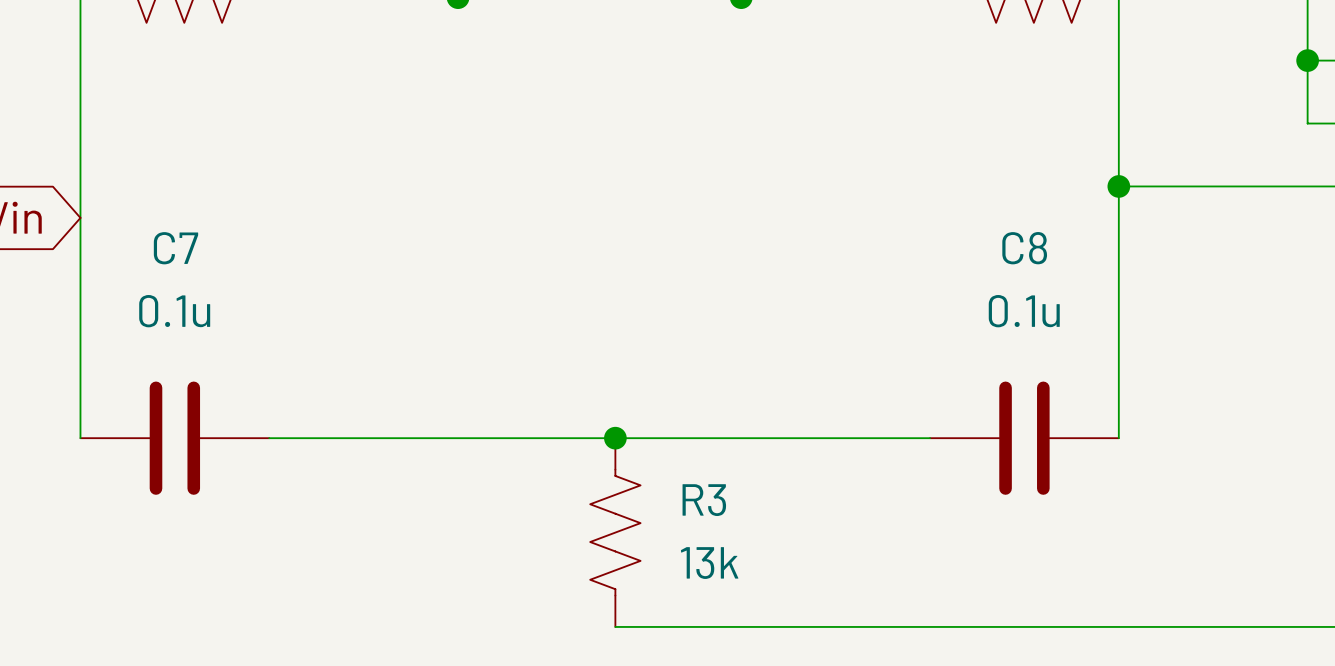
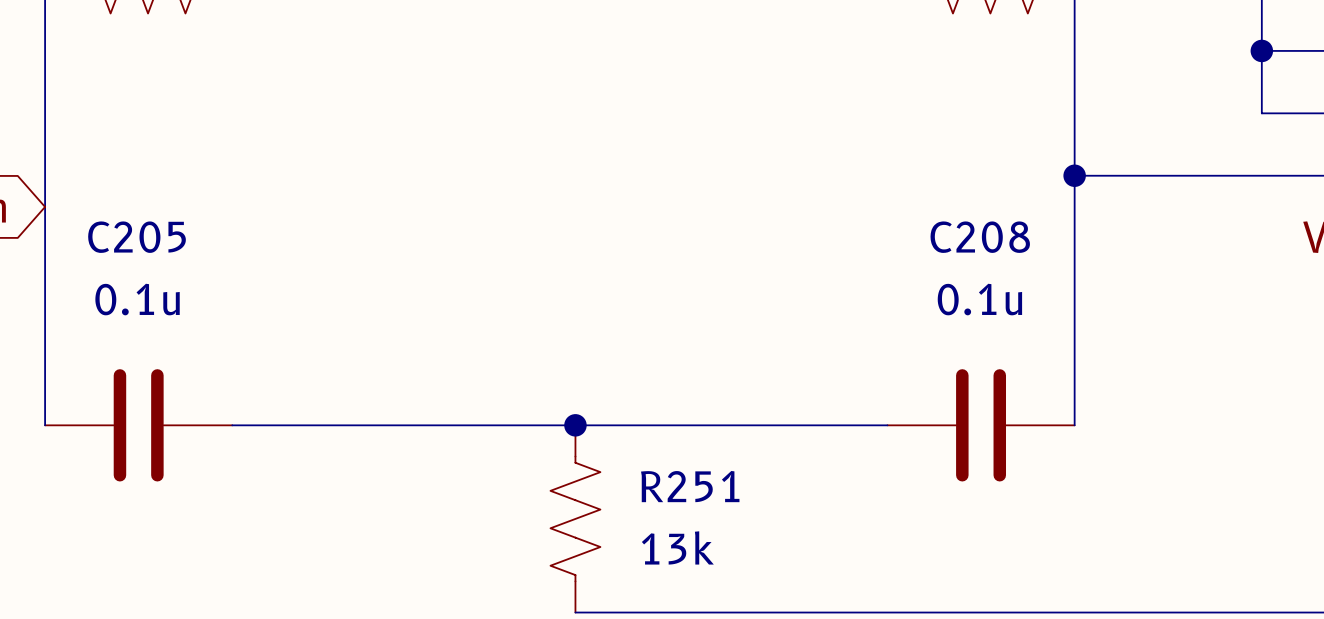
C7 name: C7 (175, 248) -> C205 (137, 237)
C8 name: C8 (1024, 248) -> C208 (980, 237)
R3 name: R3 (704, 500) -> R251 (690, 486)

